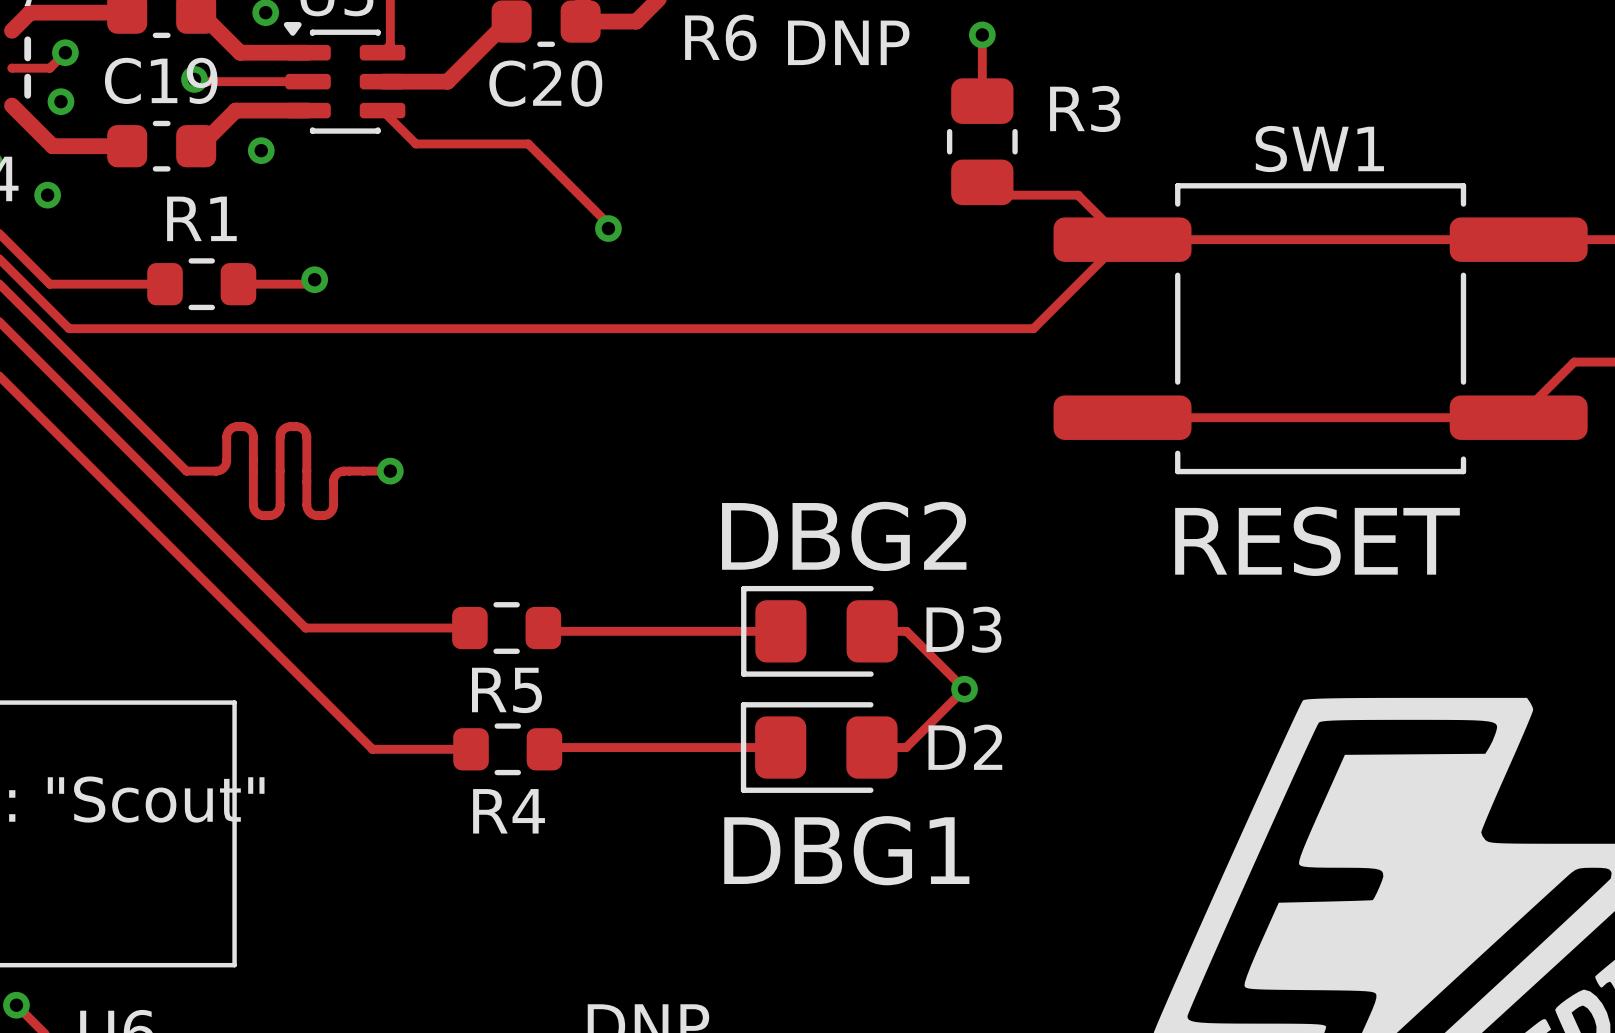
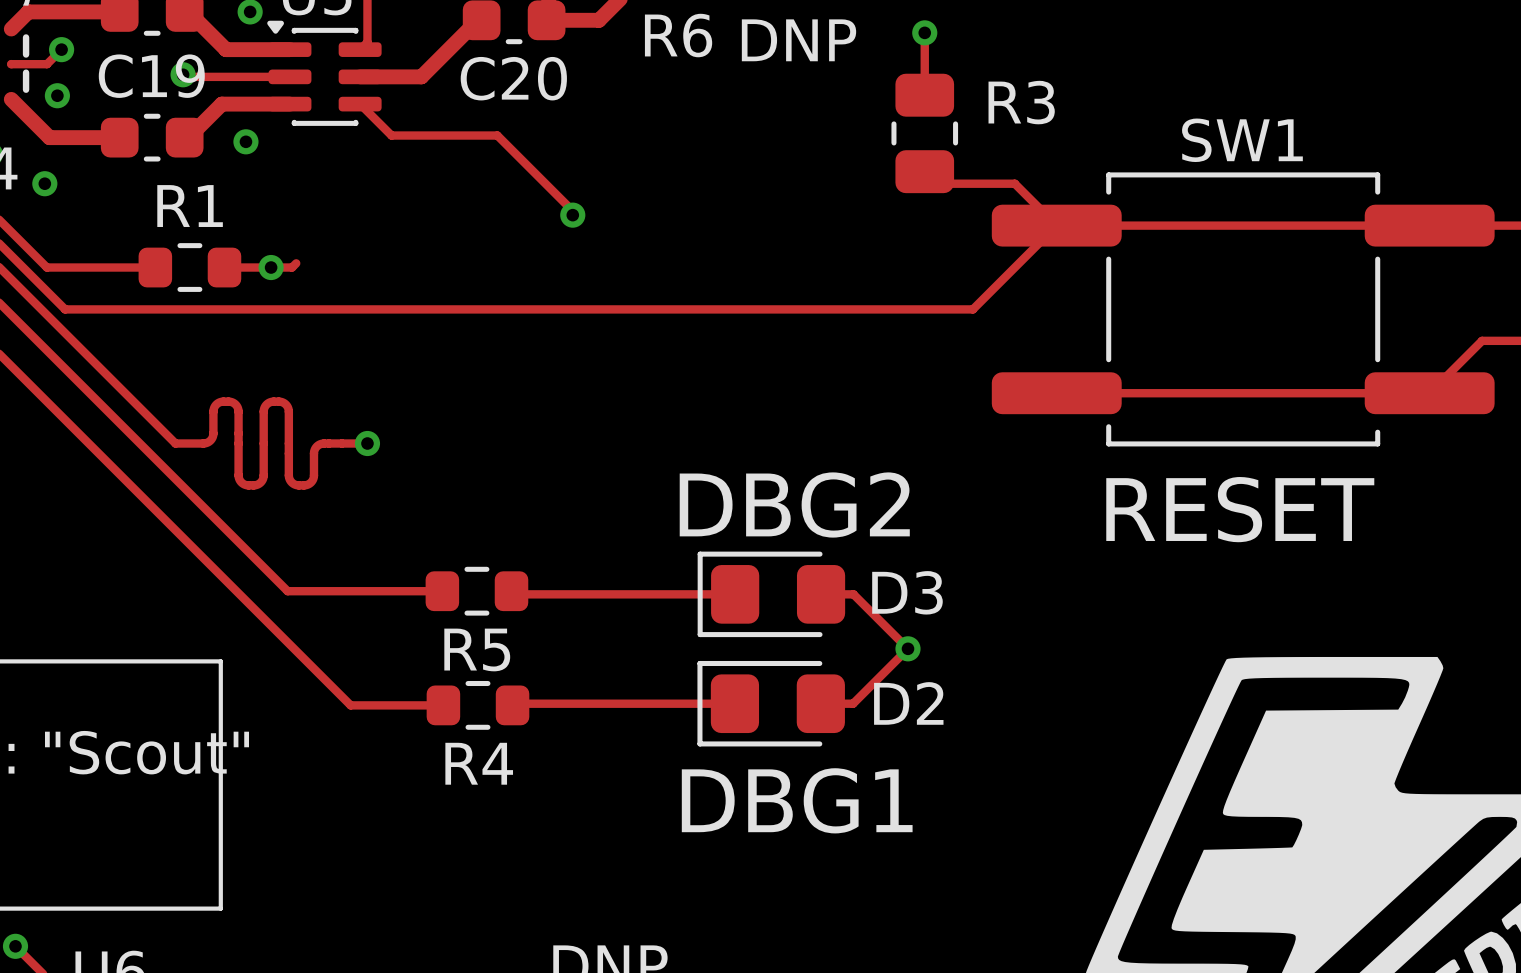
via position: (314, 279) -> (271, 267)

